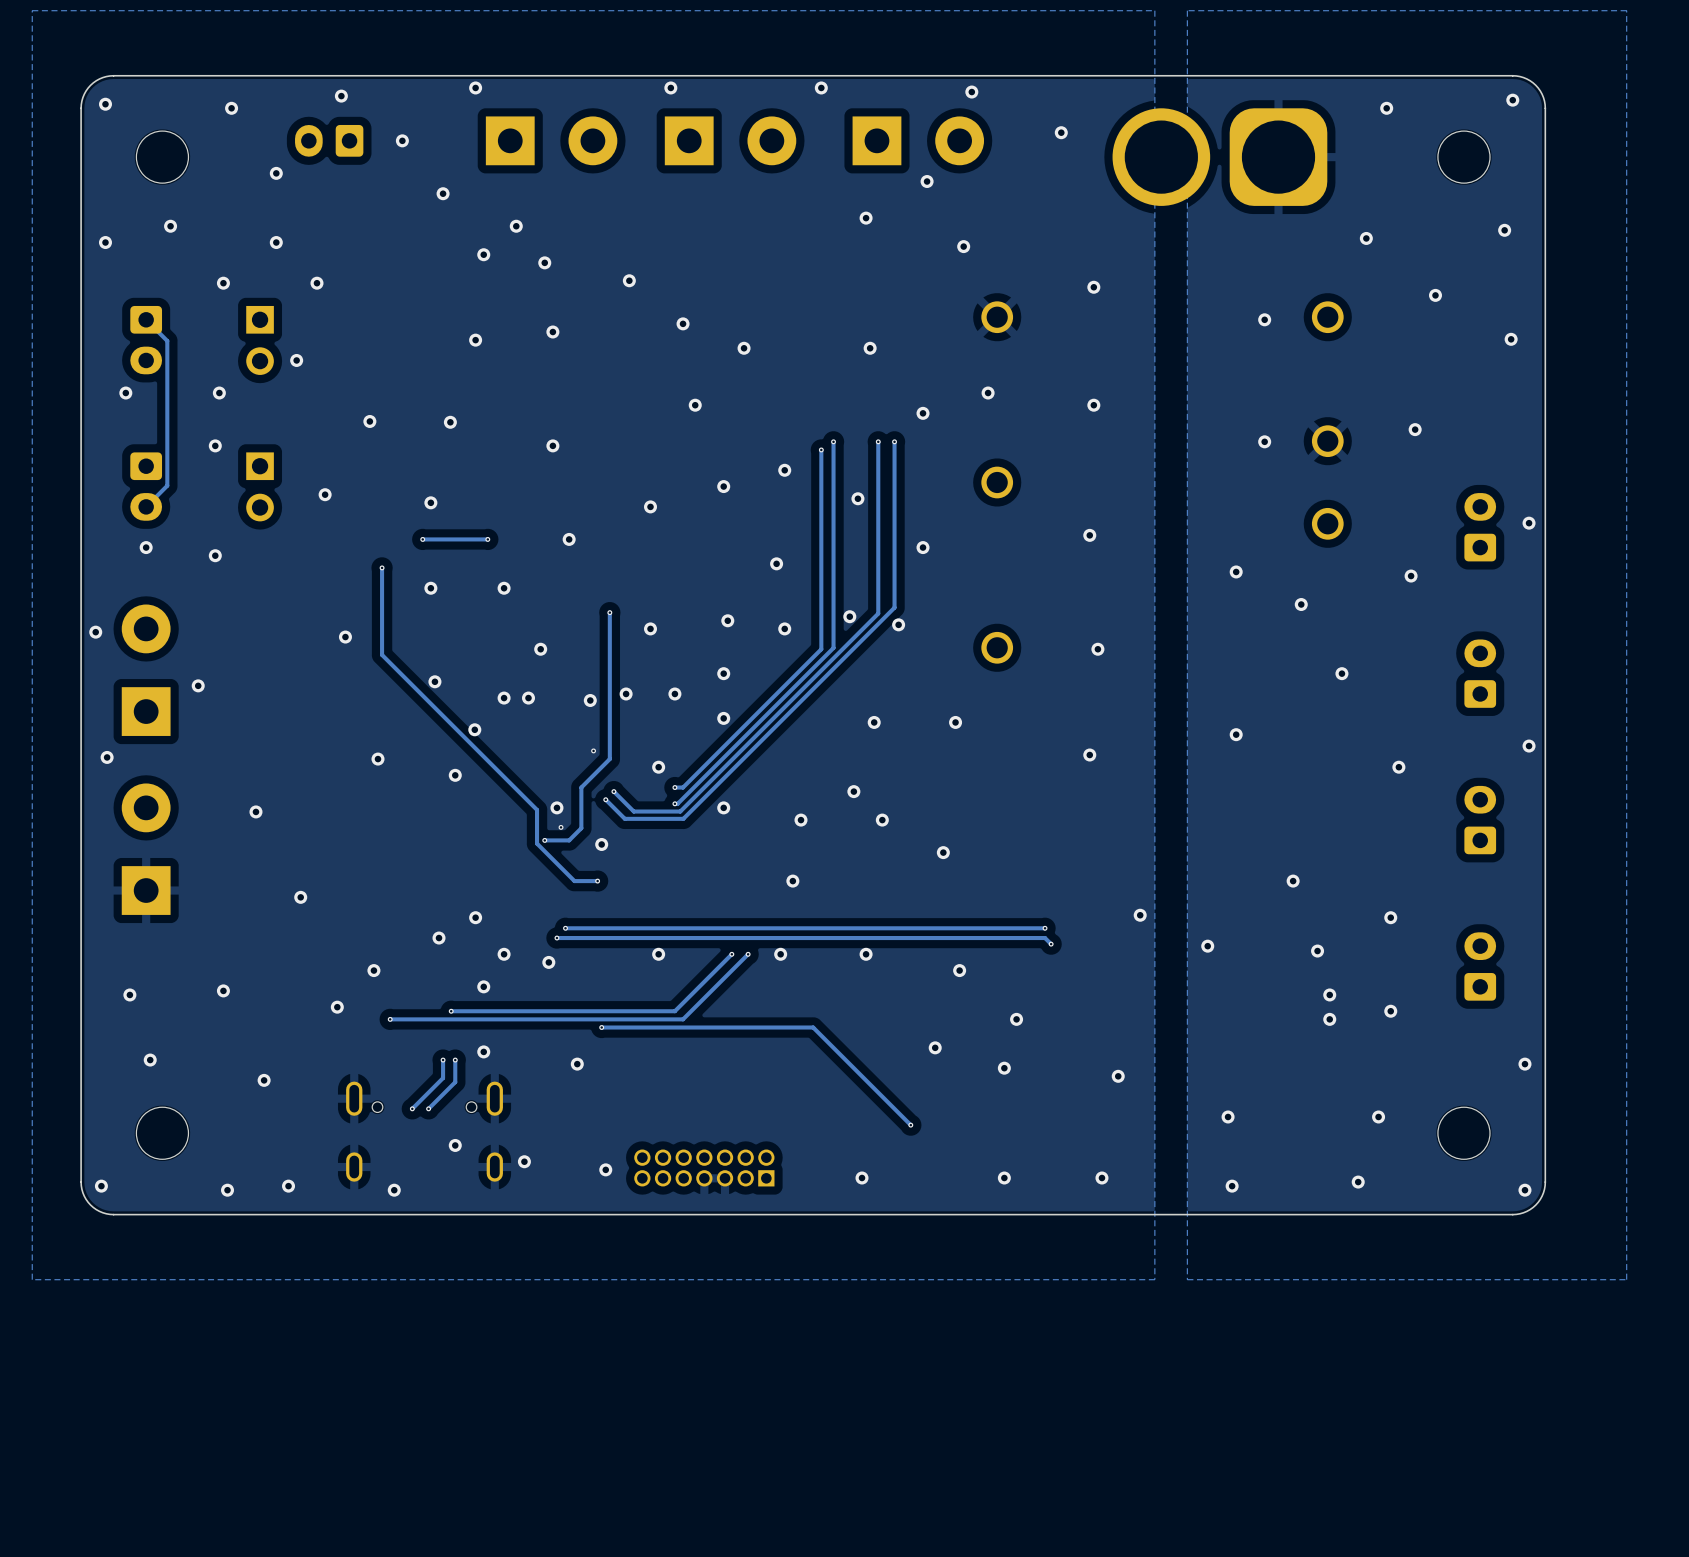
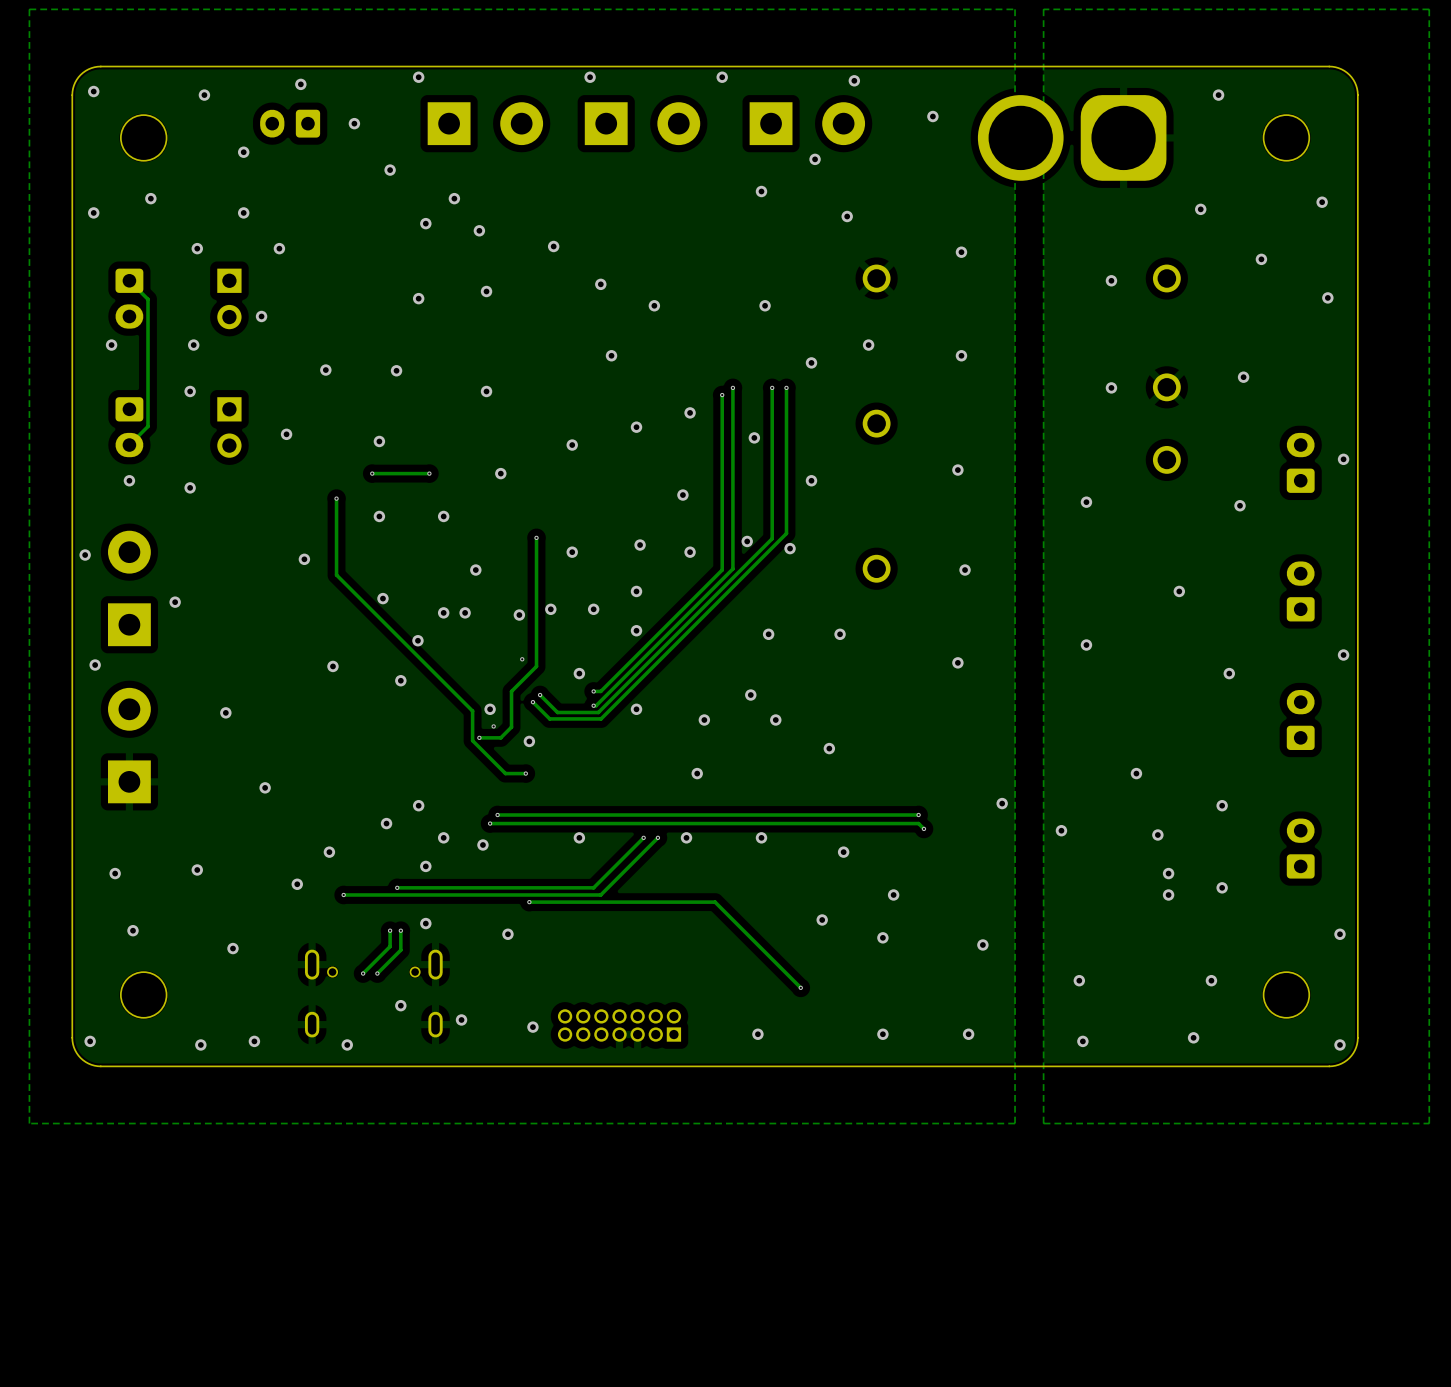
via: (1512, 100) -> none
via: (1301, 604) -> none

